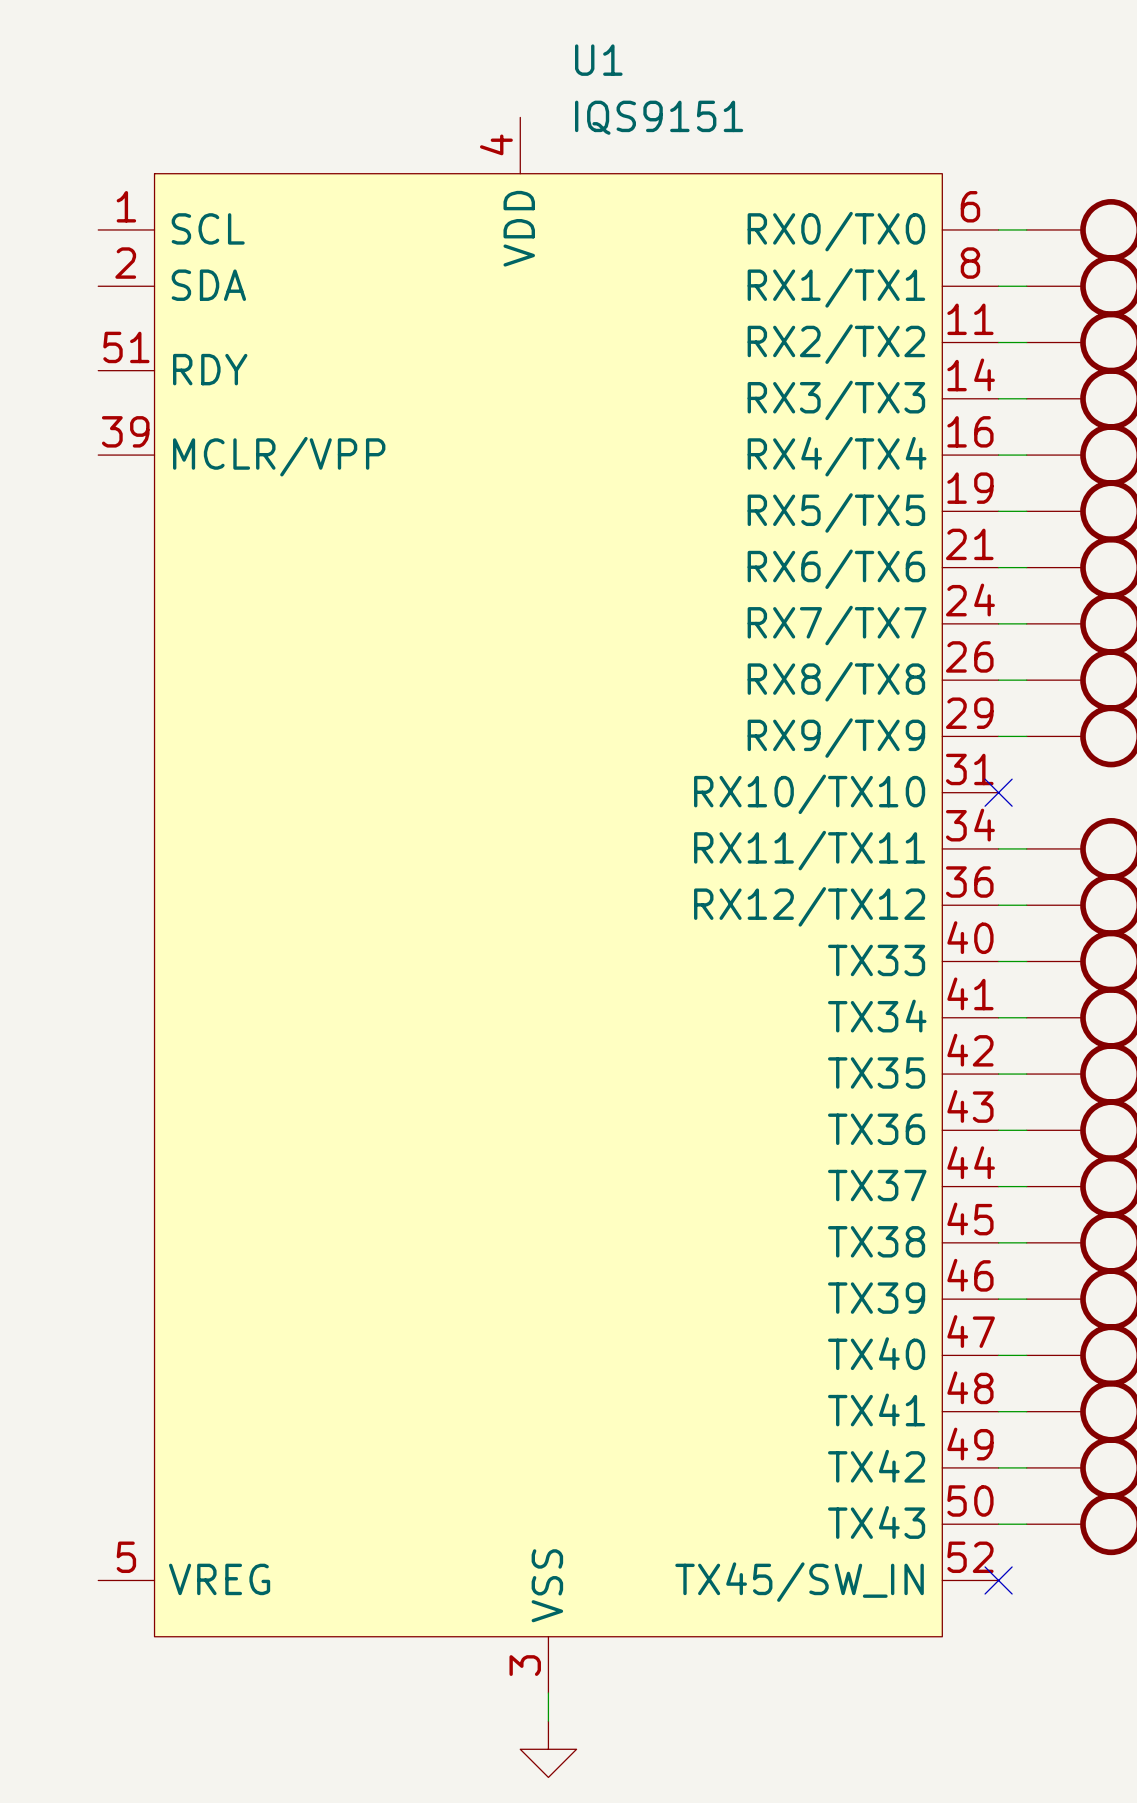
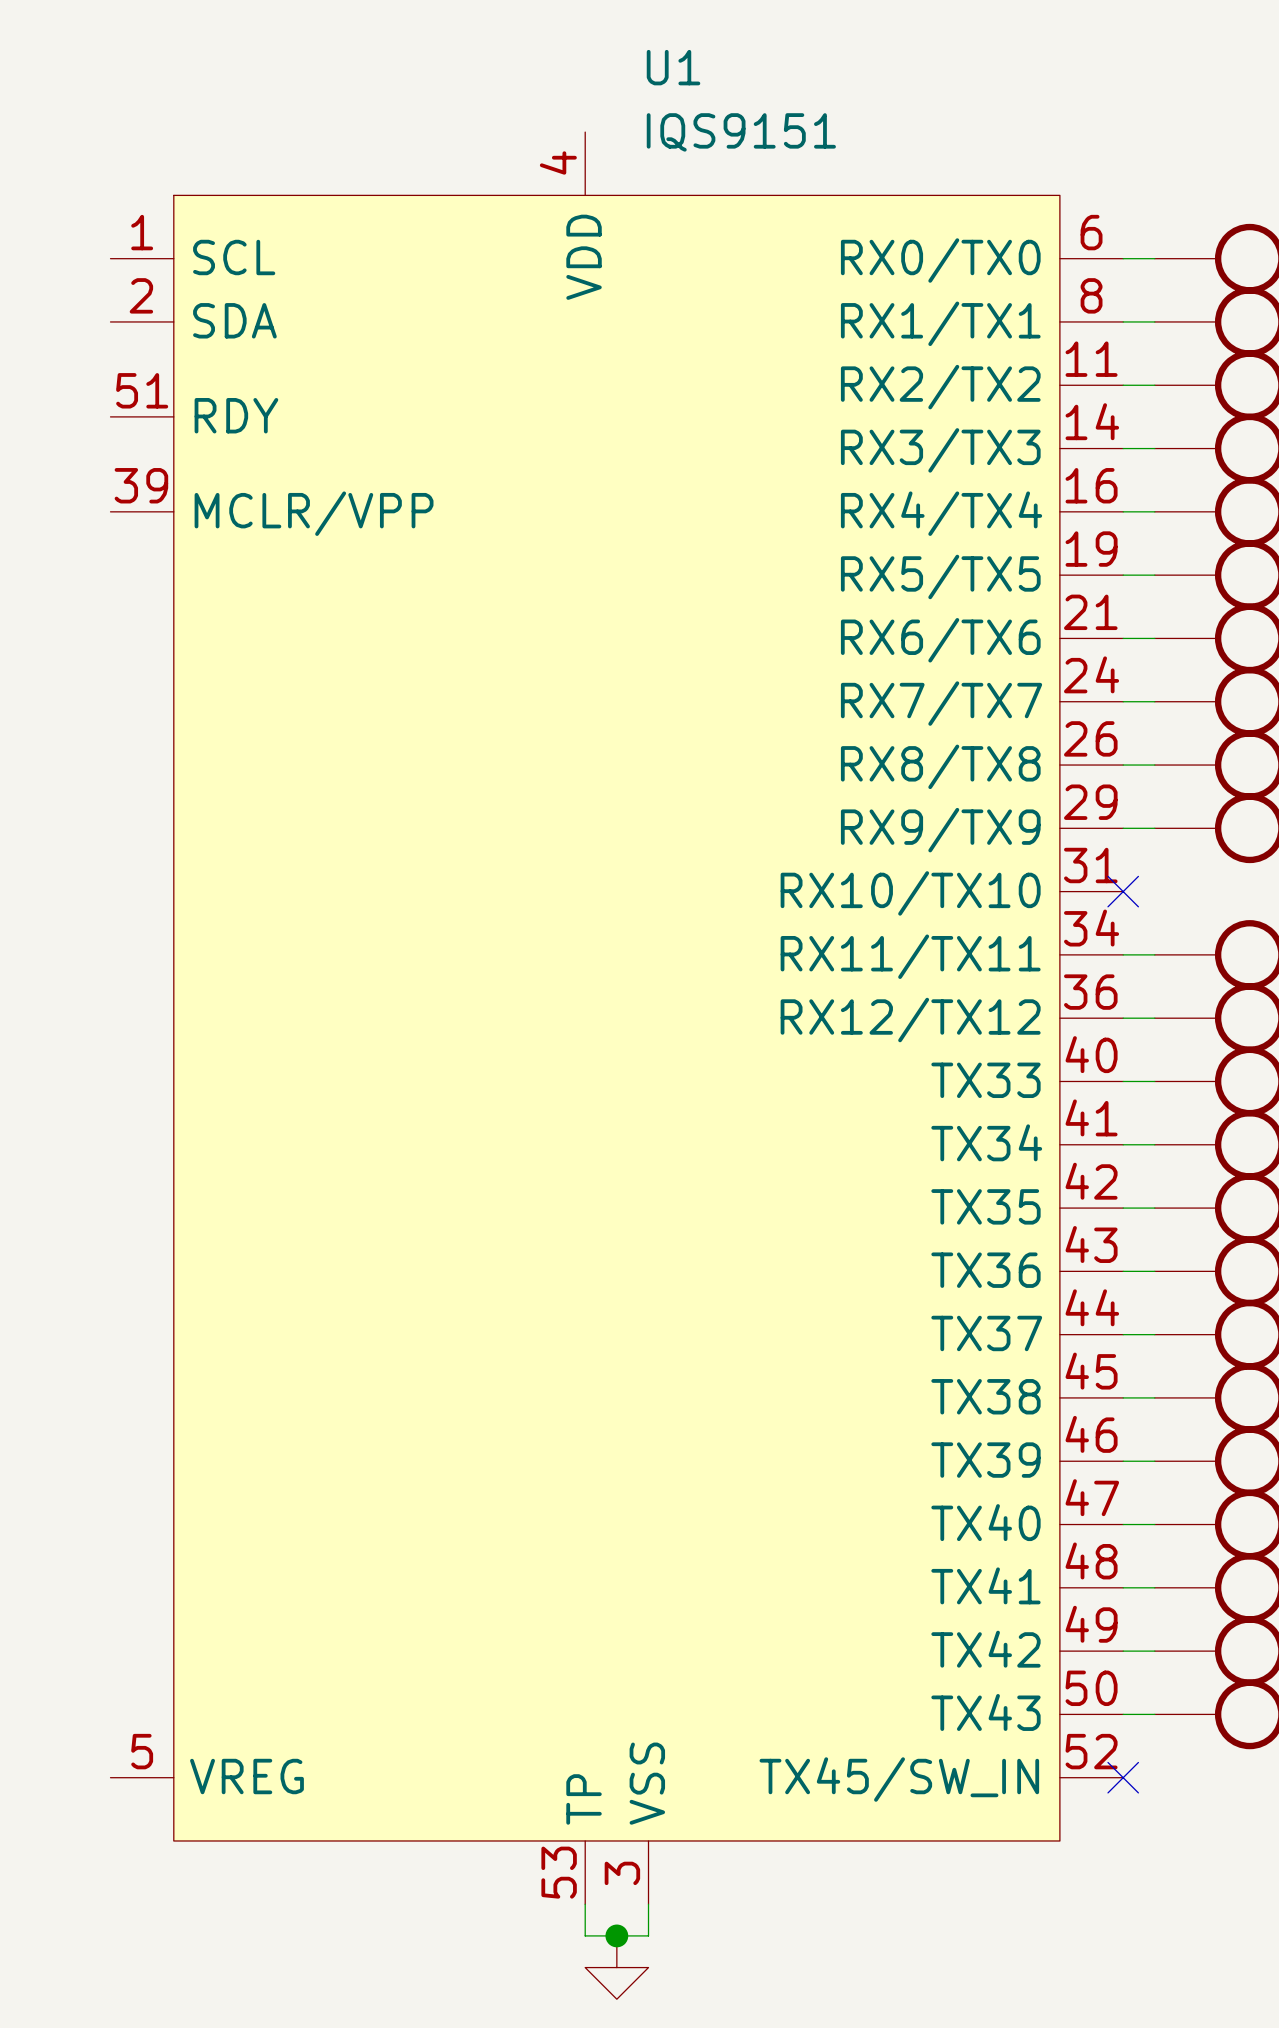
U1 symbol: [98, 117, 999, 1694] -> [110, 132, 1124, 1905]
wire: none -> (585, 1904) (585, 1935) (648, 1935) (648, 1904)
wire: (548, 1693) (548, 1721) -> none
junction: none -> (616, 1935)

